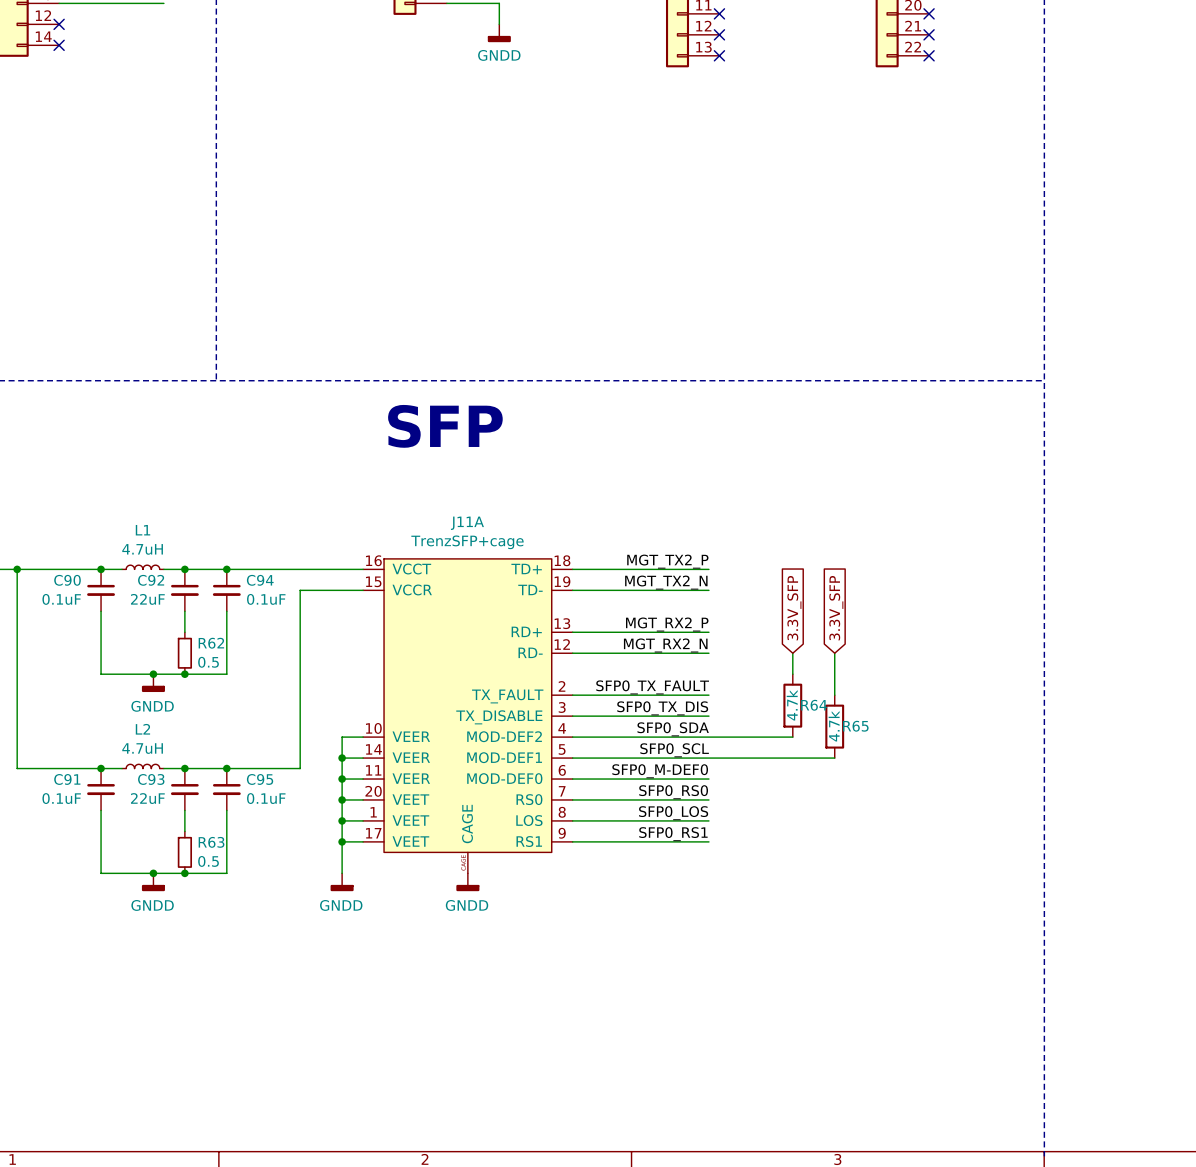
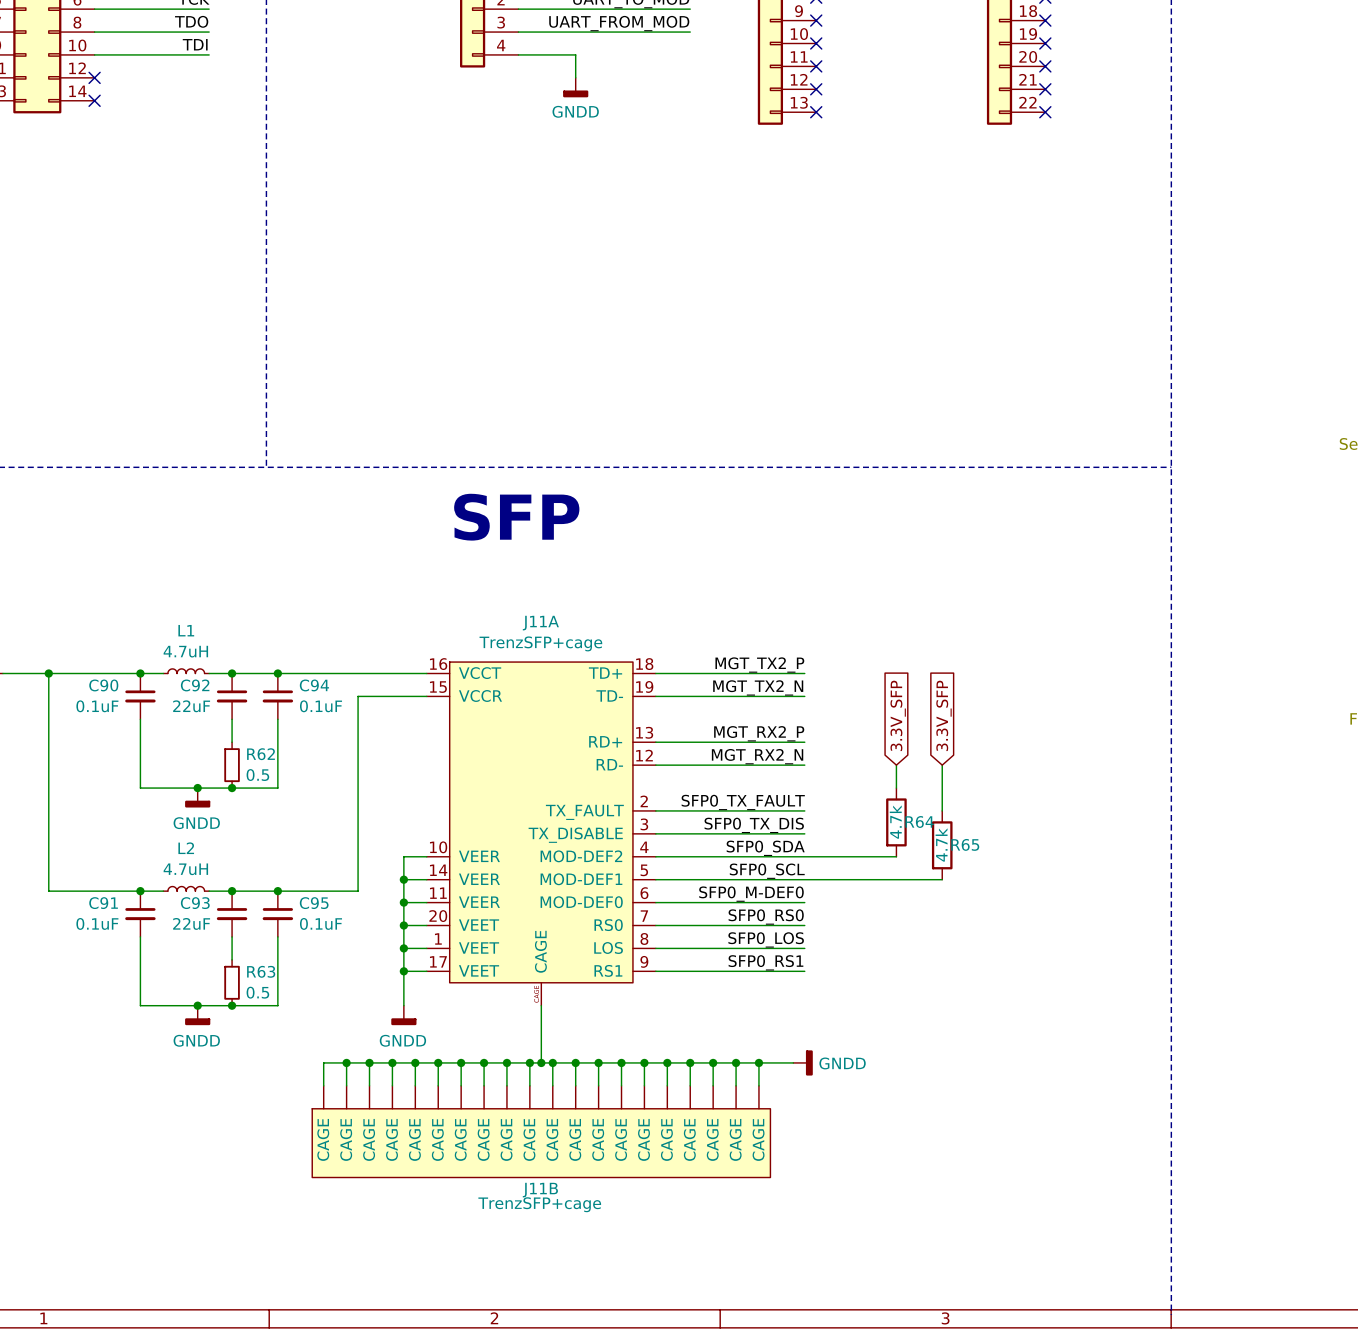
wire: none -> (541, 1005) (541, 1062)
power symbol: GNDD (467, 882) -> none
wire: none -> (346, 1062) (346, 1085)
junction: none -> (346, 1062)
wire: none -> (369, 1062) (369, 1085)
junction: none -> (369, 1062)
wire: none -> (392, 1062) (392, 1085)
junction: none -> (392, 1062)
wire: none -> (415, 1062) (415, 1085)
junction: none -> (415, 1062)
wire: none -> (438, 1062) (438, 1085)
junction: none -> (438, 1062)
wire: none -> (461, 1062) (461, 1085)
junction: none -> (461, 1062)
wire: none -> (484, 1062) (484, 1085)
junction: none -> (484, 1062)
wire: none -> (506, 1062) (506, 1085)
junction: none -> (506, 1062)
wire: none -> (529, 1062) (529, 1085)
junction: none -> (529, 1062)
junction: none -> (541, 1062)
wire: none -> (552, 1062) (552, 1085)
junction: none -> (552, 1062)
wire: none -> (575, 1062) (575, 1085)
junction: none -> (575, 1062)
wire: none -> (598, 1062) (598, 1085)
junction: none -> (598, 1062)
wire: none -> (621, 1062) (621, 1085)
junction: none -> (621, 1062)
wire: none -> (644, 1062) (644, 1085)
junction: none -> (644, 1062)
wire: none -> (667, 1062) (667, 1085)
junction: none -> (667, 1062)
wire: none -> (690, 1062) (690, 1085)
junction: none -> (690, 1062)
wire: none -> (713, 1062) (713, 1085)
junction: none -> (713, 1062)
wire: none -> (736, 1062) (736, 1085)
junction: none -> (736, 1062)
wire: none -> (758, 1062) (758, 1085)
junction: none -> (758, 1062)
wire: none -> (793, 1062) (323, 1062) (323, 1085)
power symbol: none -> GNDD (803, 1062)
J11B: none -> TrenzSFP+cage (541, 1131)

